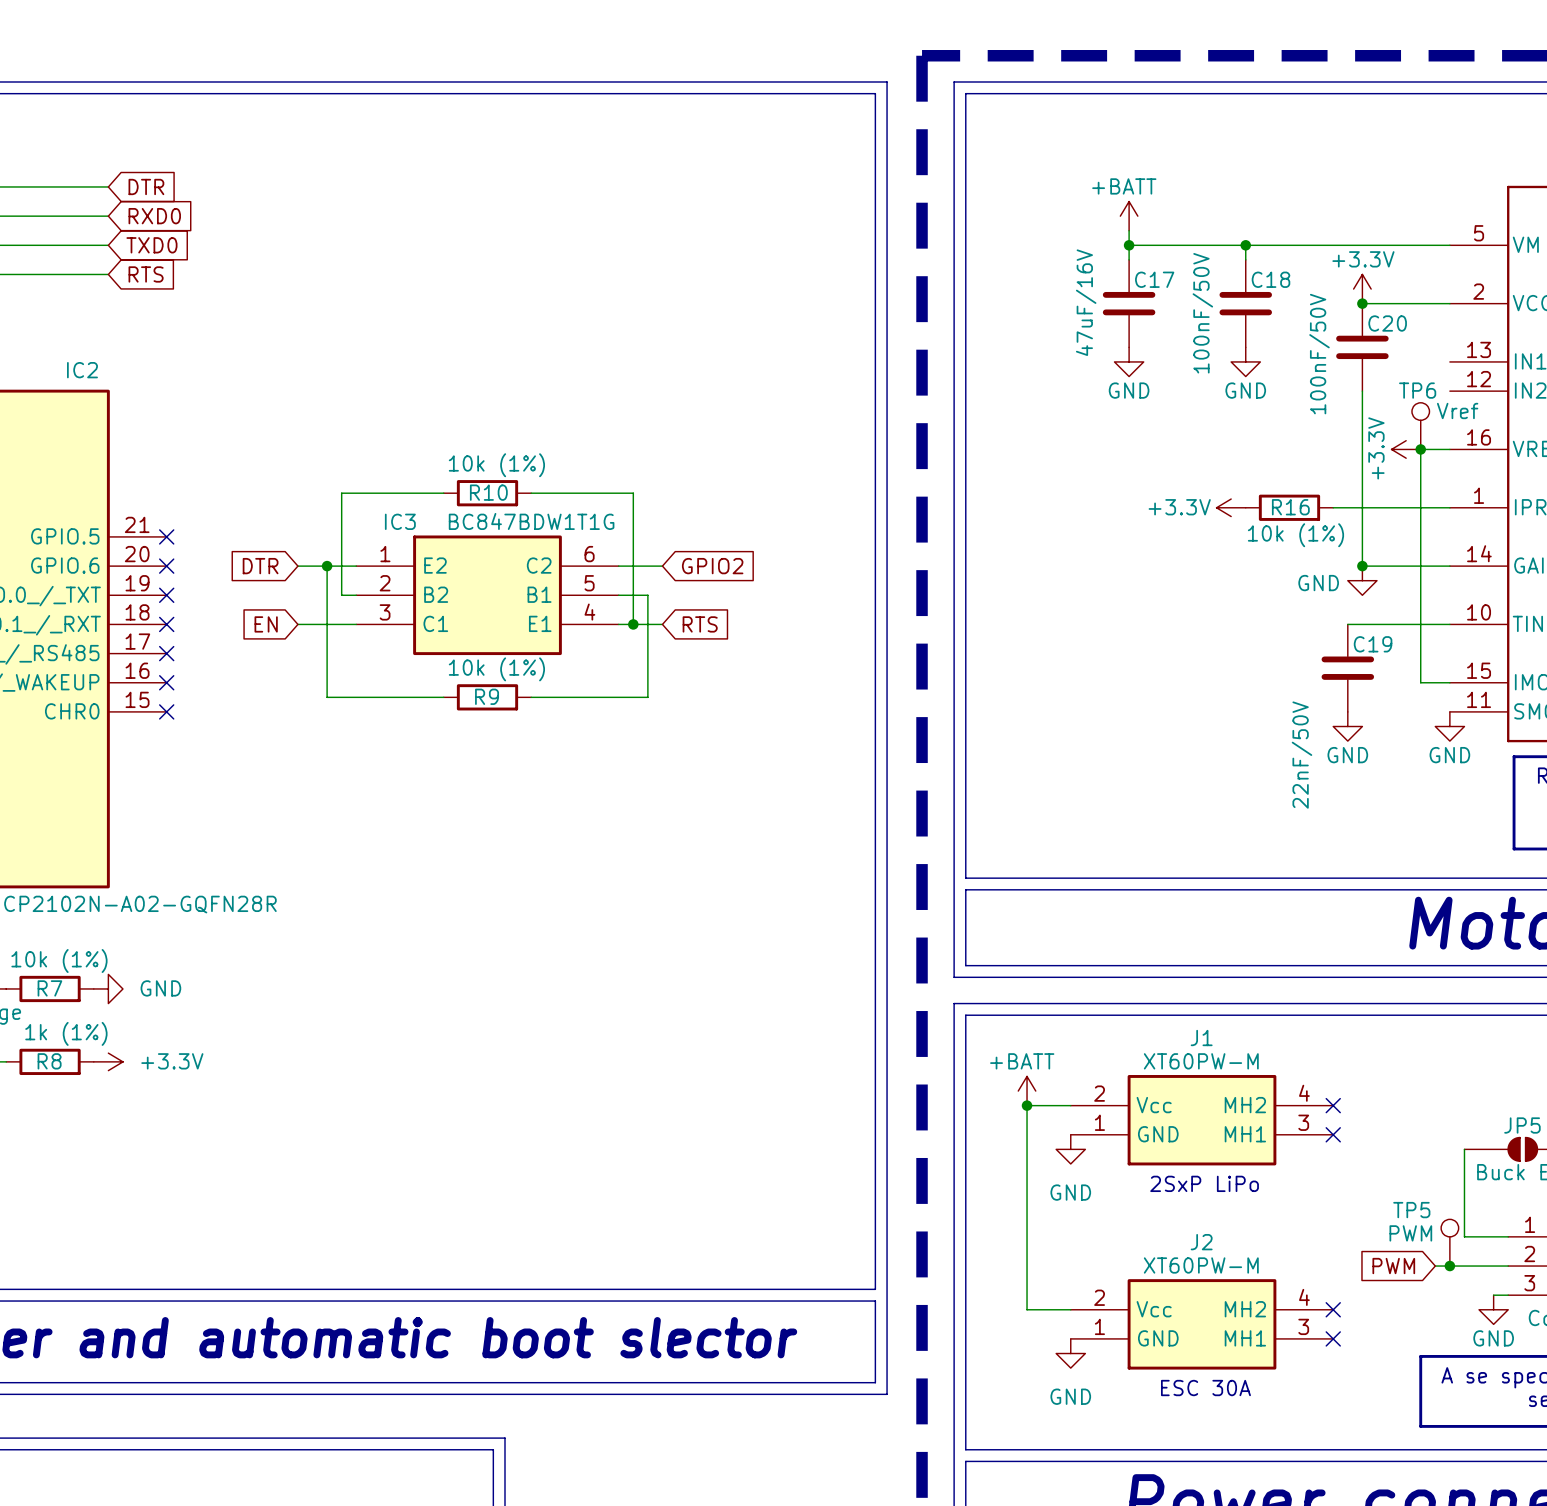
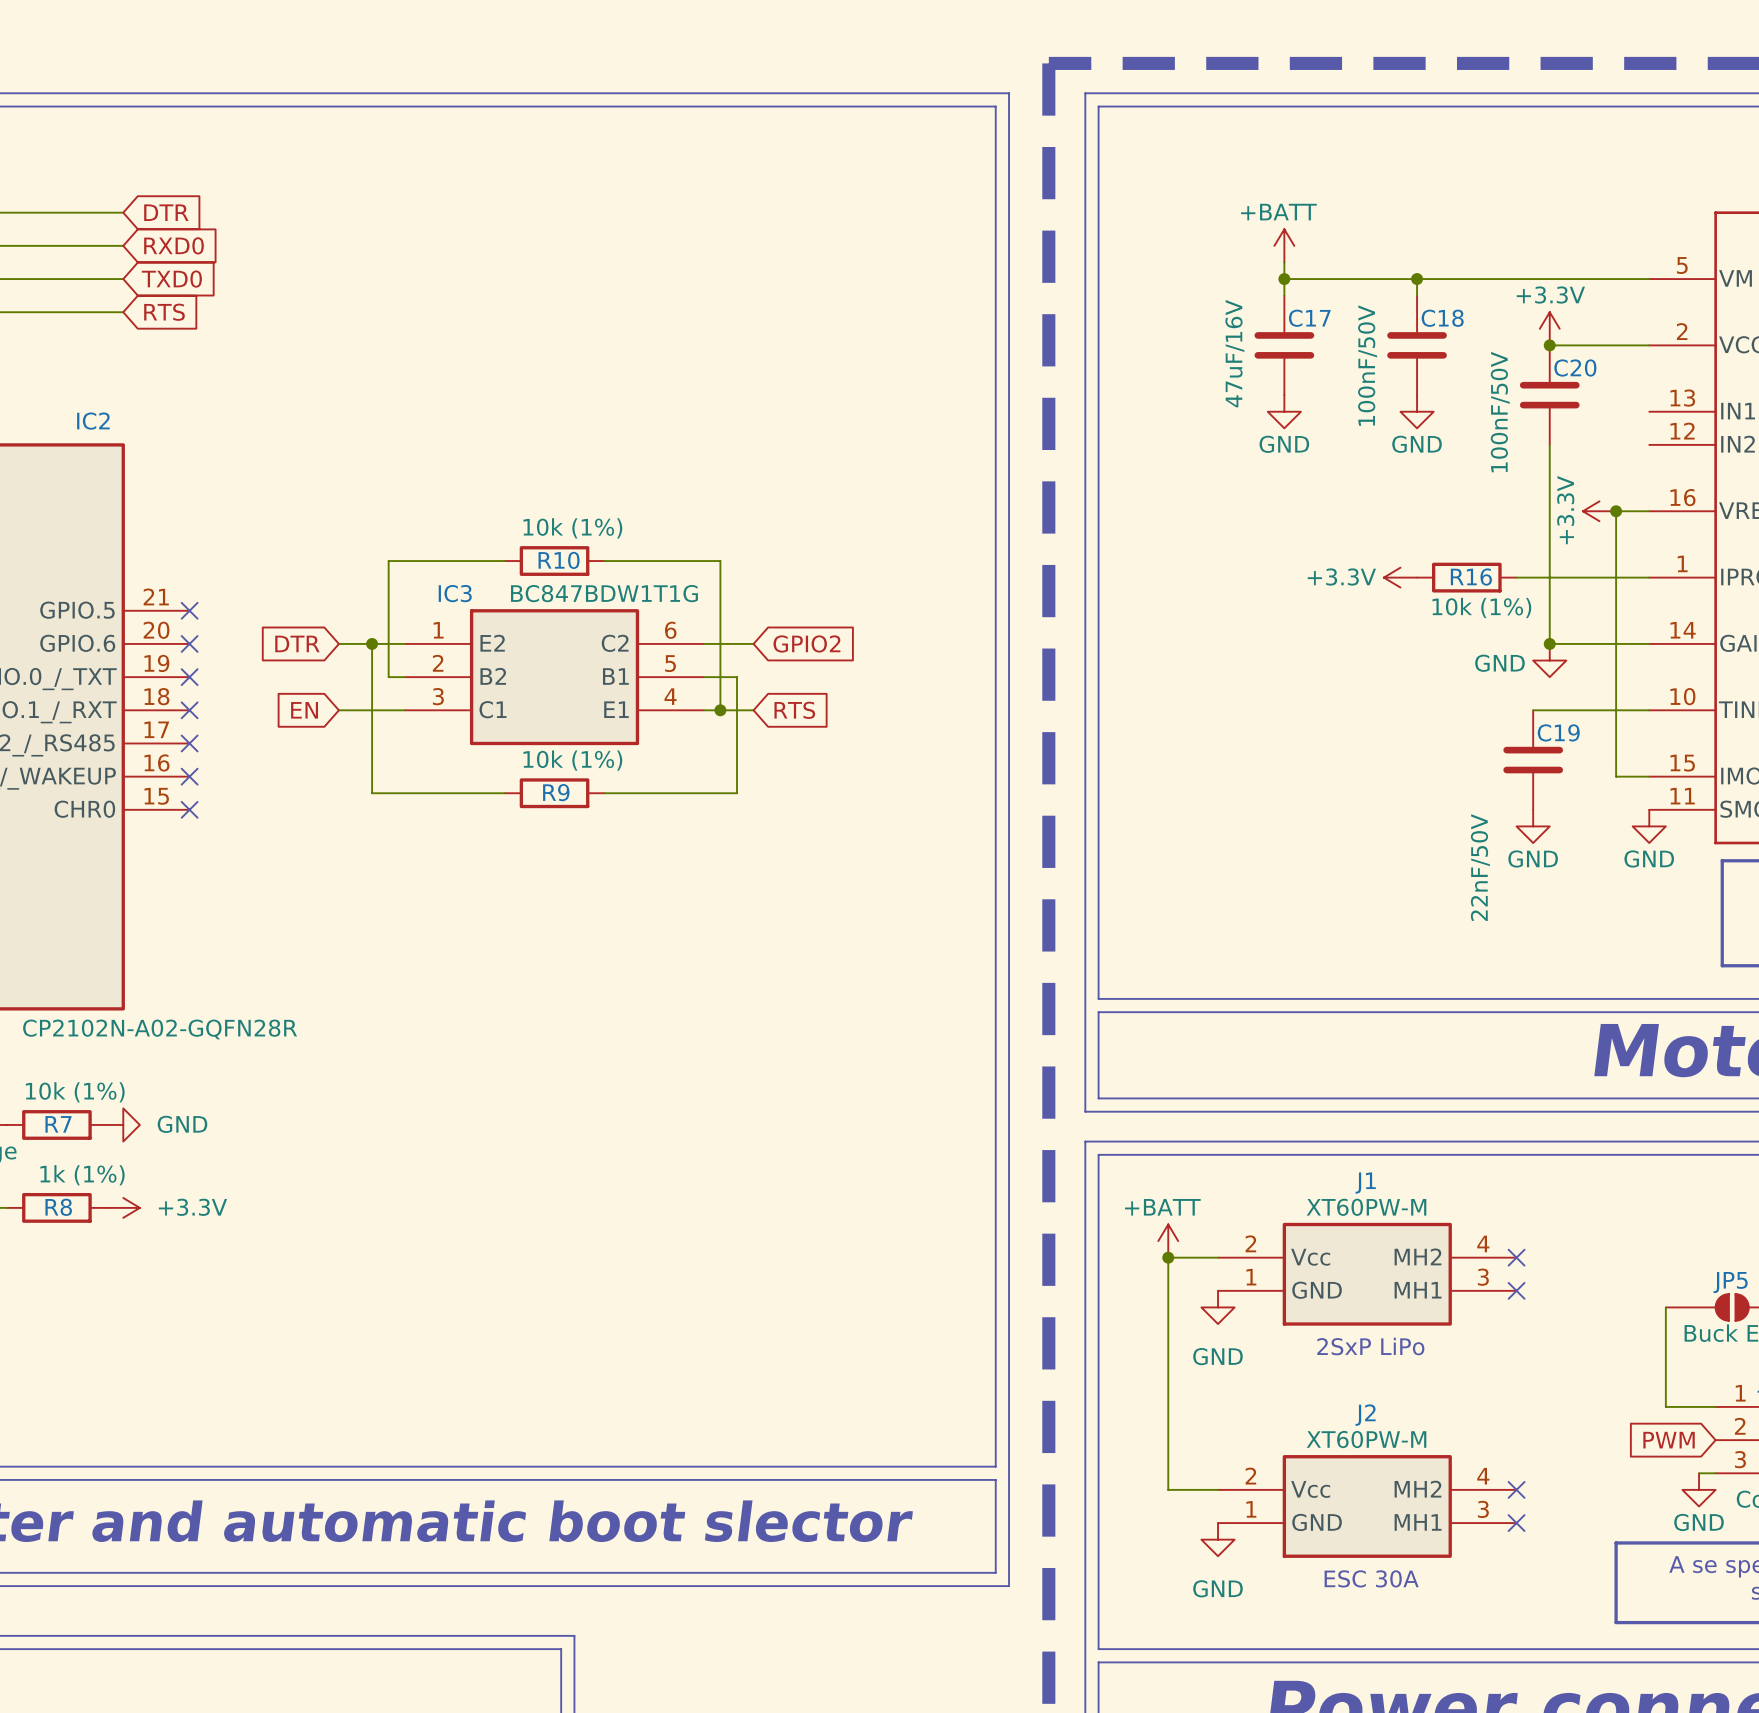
TP6: Vref (1420, 426) -> none
TP5: PWM (1449, 1242) -> none
global label position: PWM (1393, 1266) -> PWM (1669, 1440)
wire: (1435, 1266) (1508, 1266) -> none
junction: (1449, 1266) -> none

